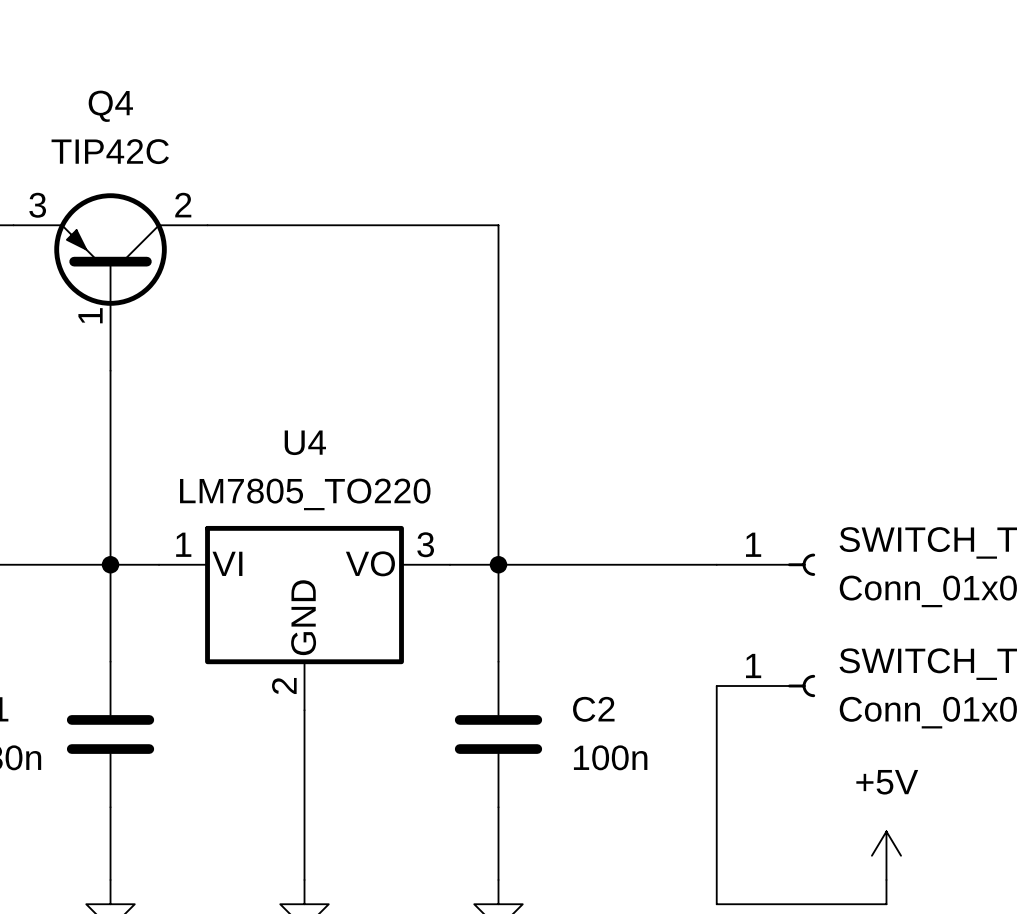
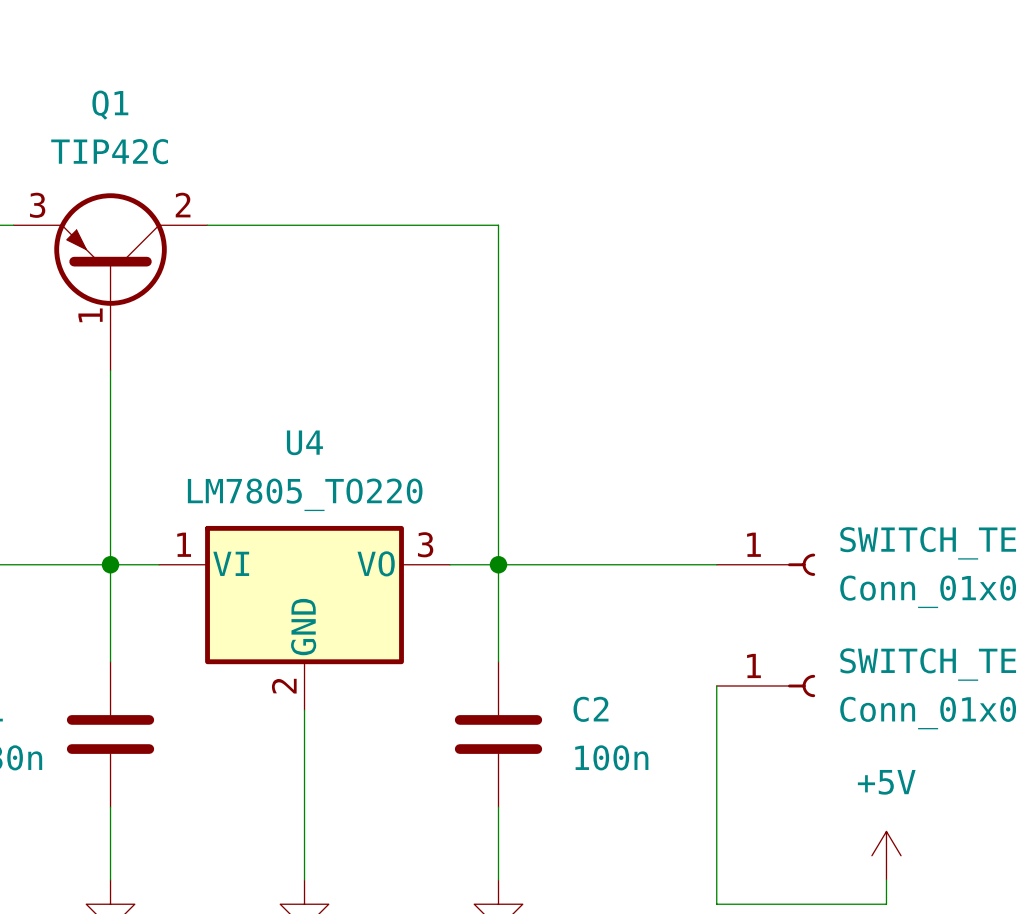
Q4 name: Q4 (110, 106) -> Q1 (110, 105)

